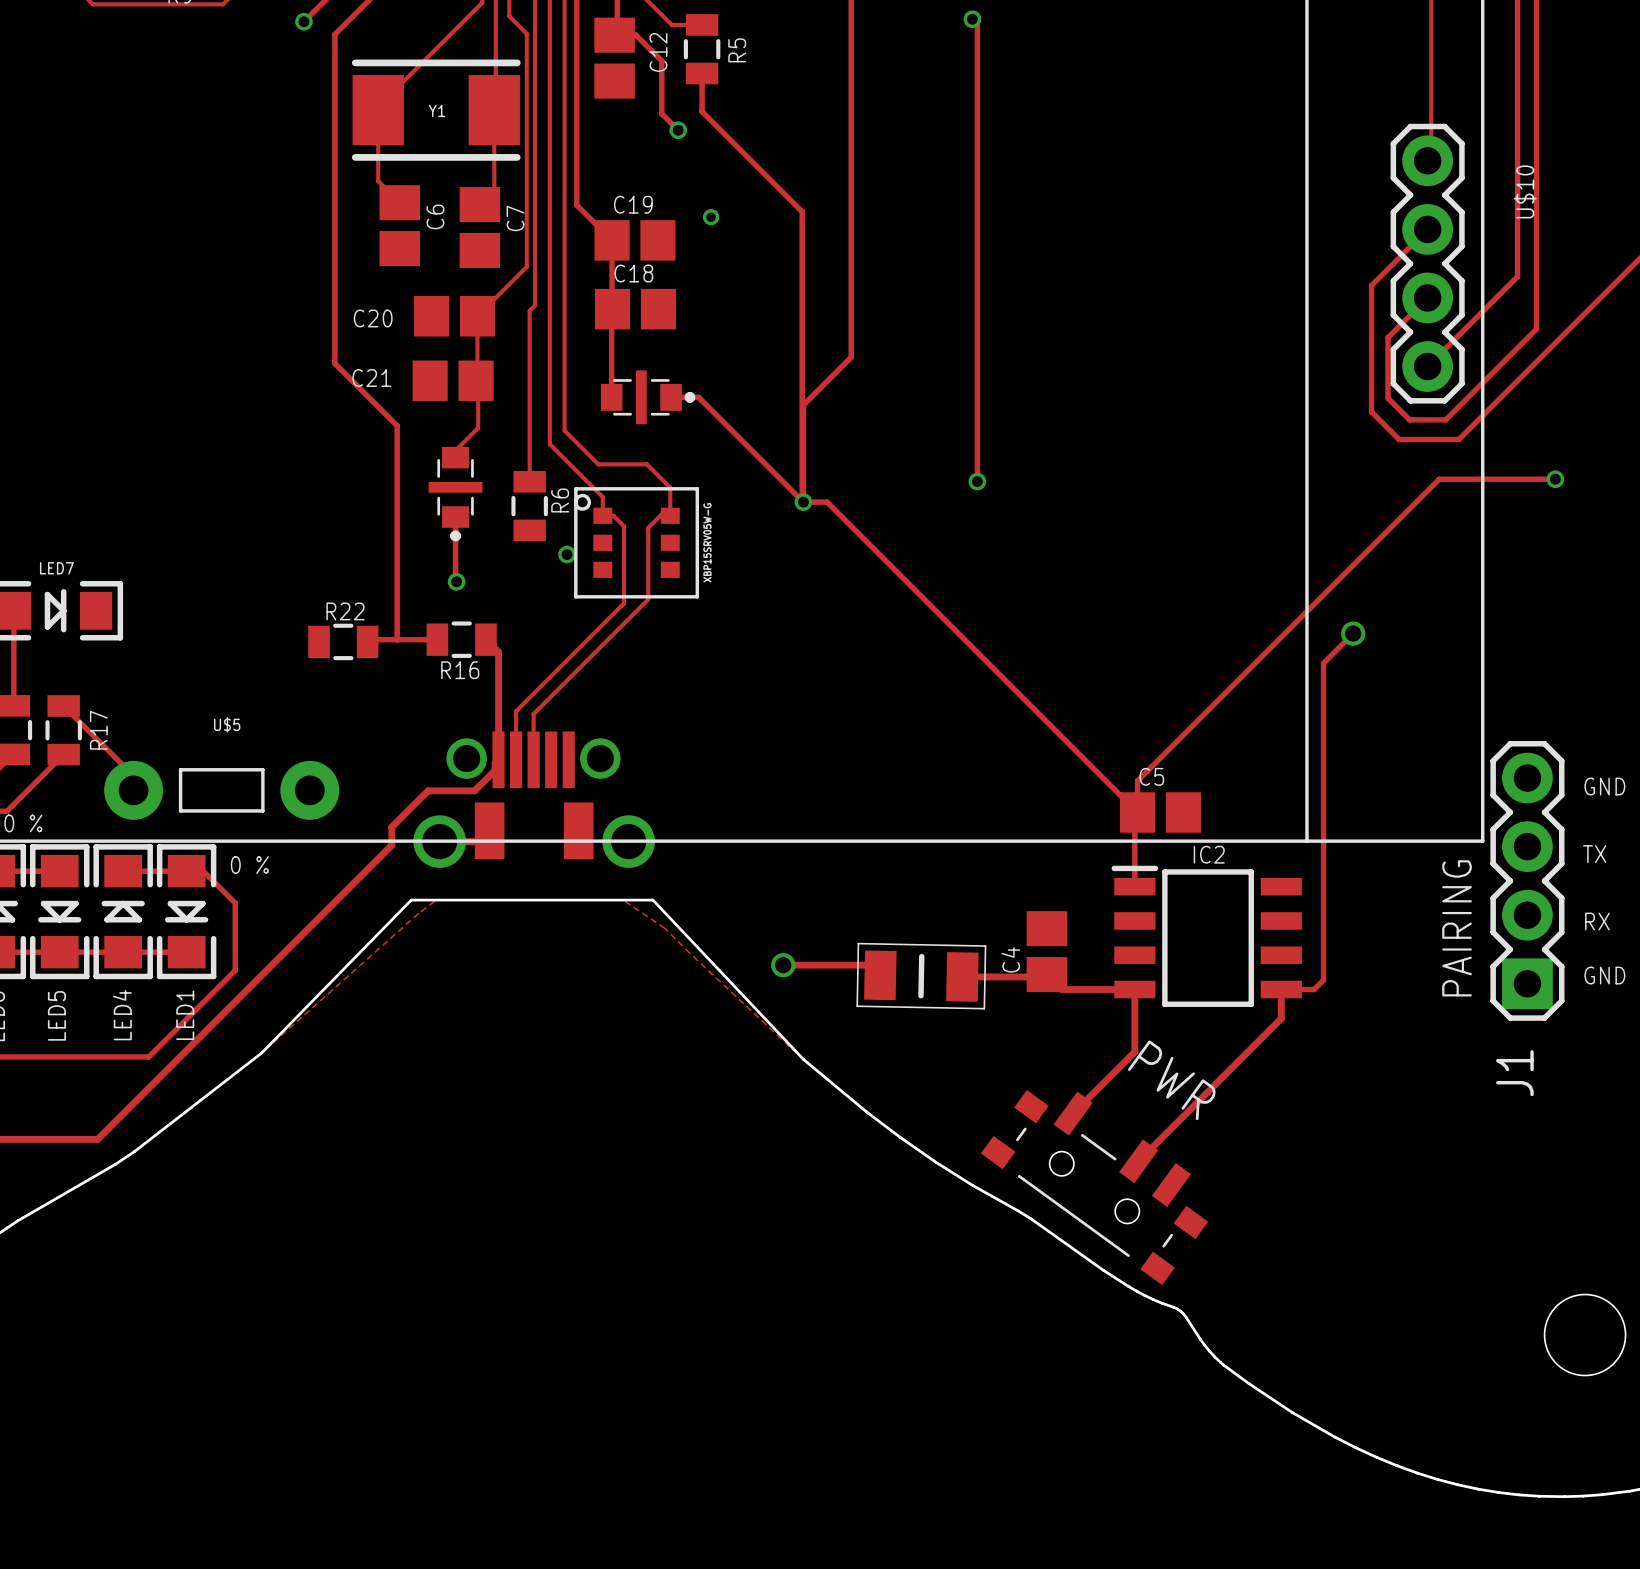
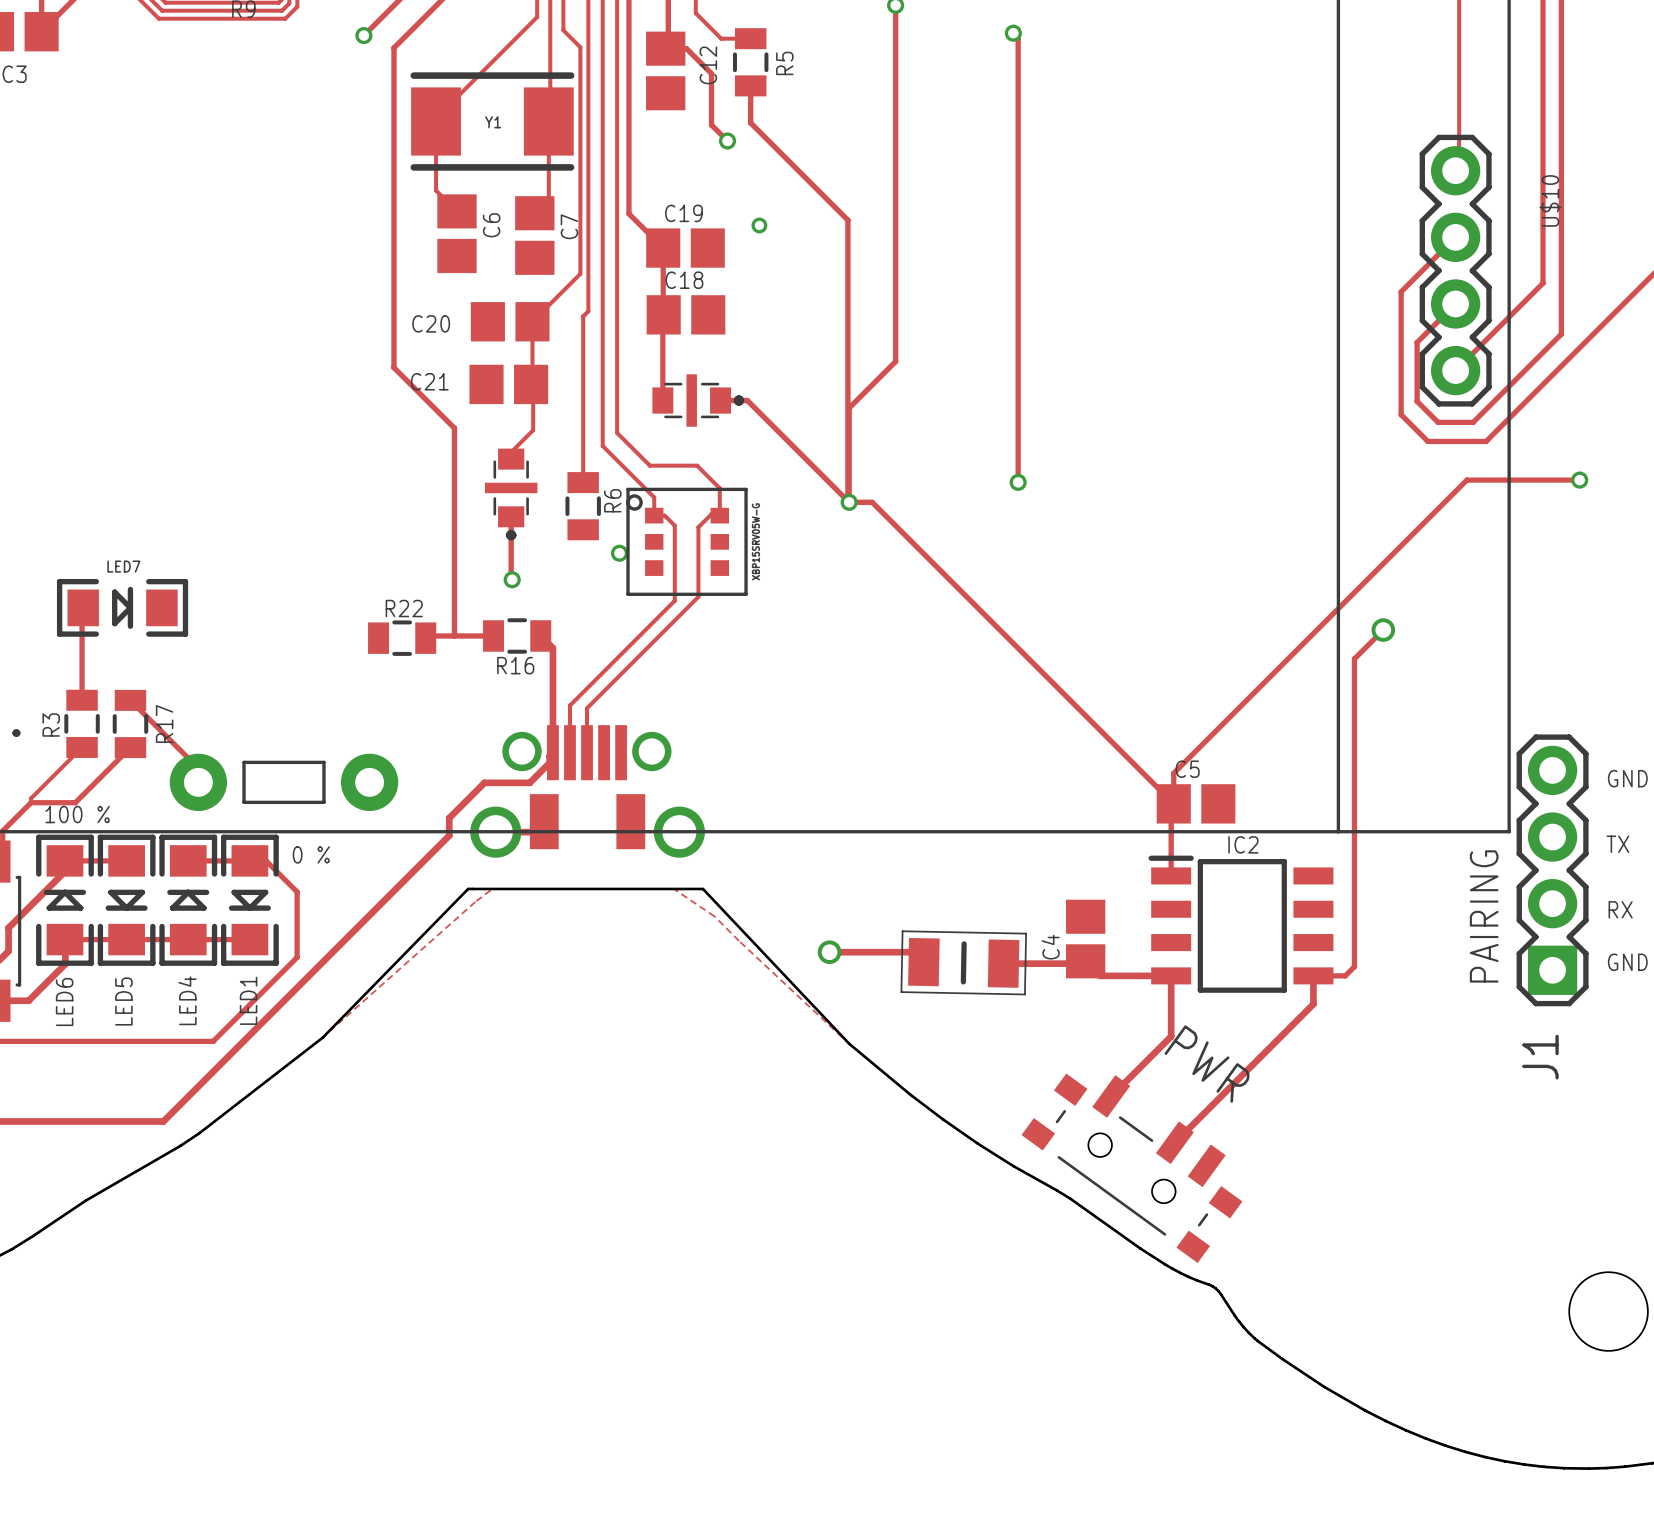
U$5 name: U$5 (227, 724) -> none

